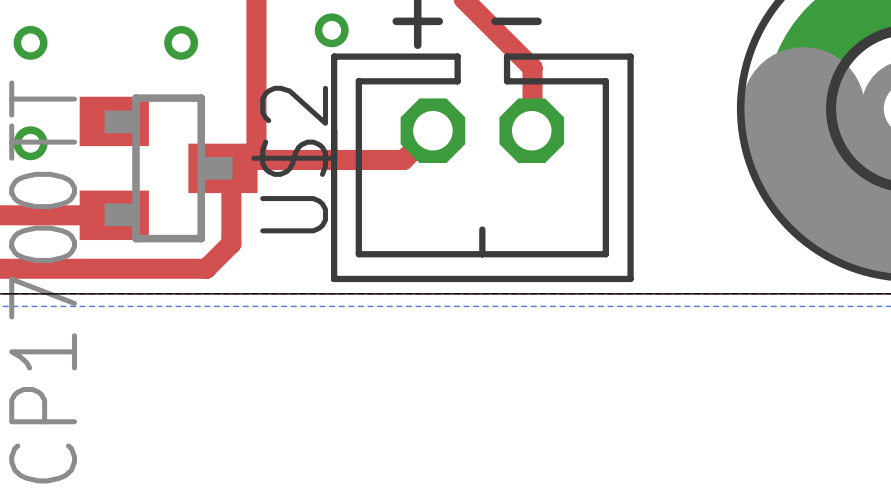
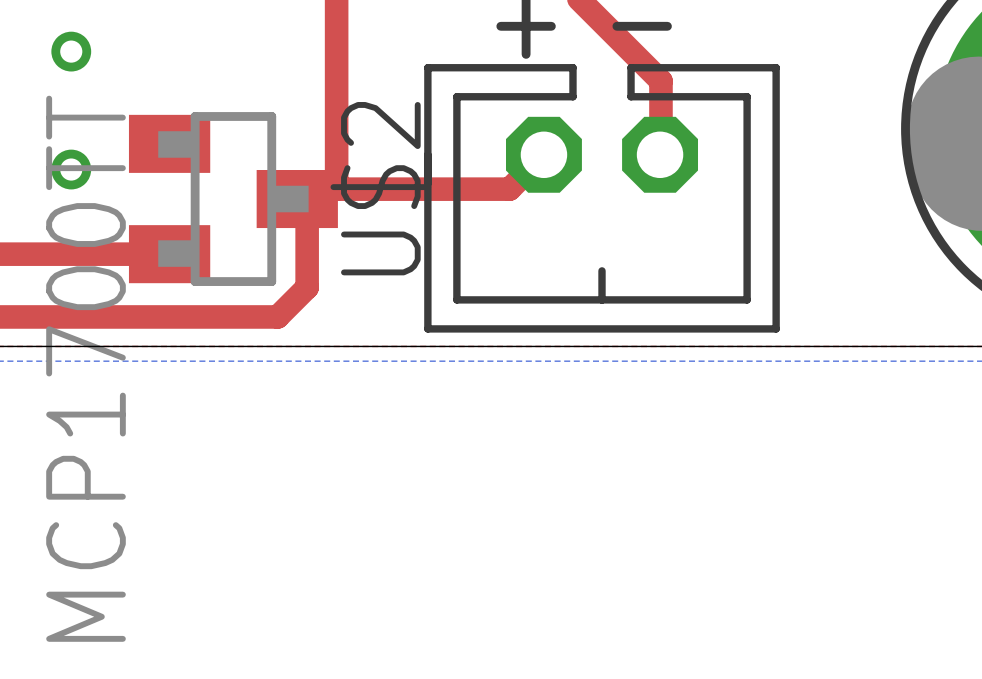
via: (331, 30) -> none
via: (181, 42) -> none

